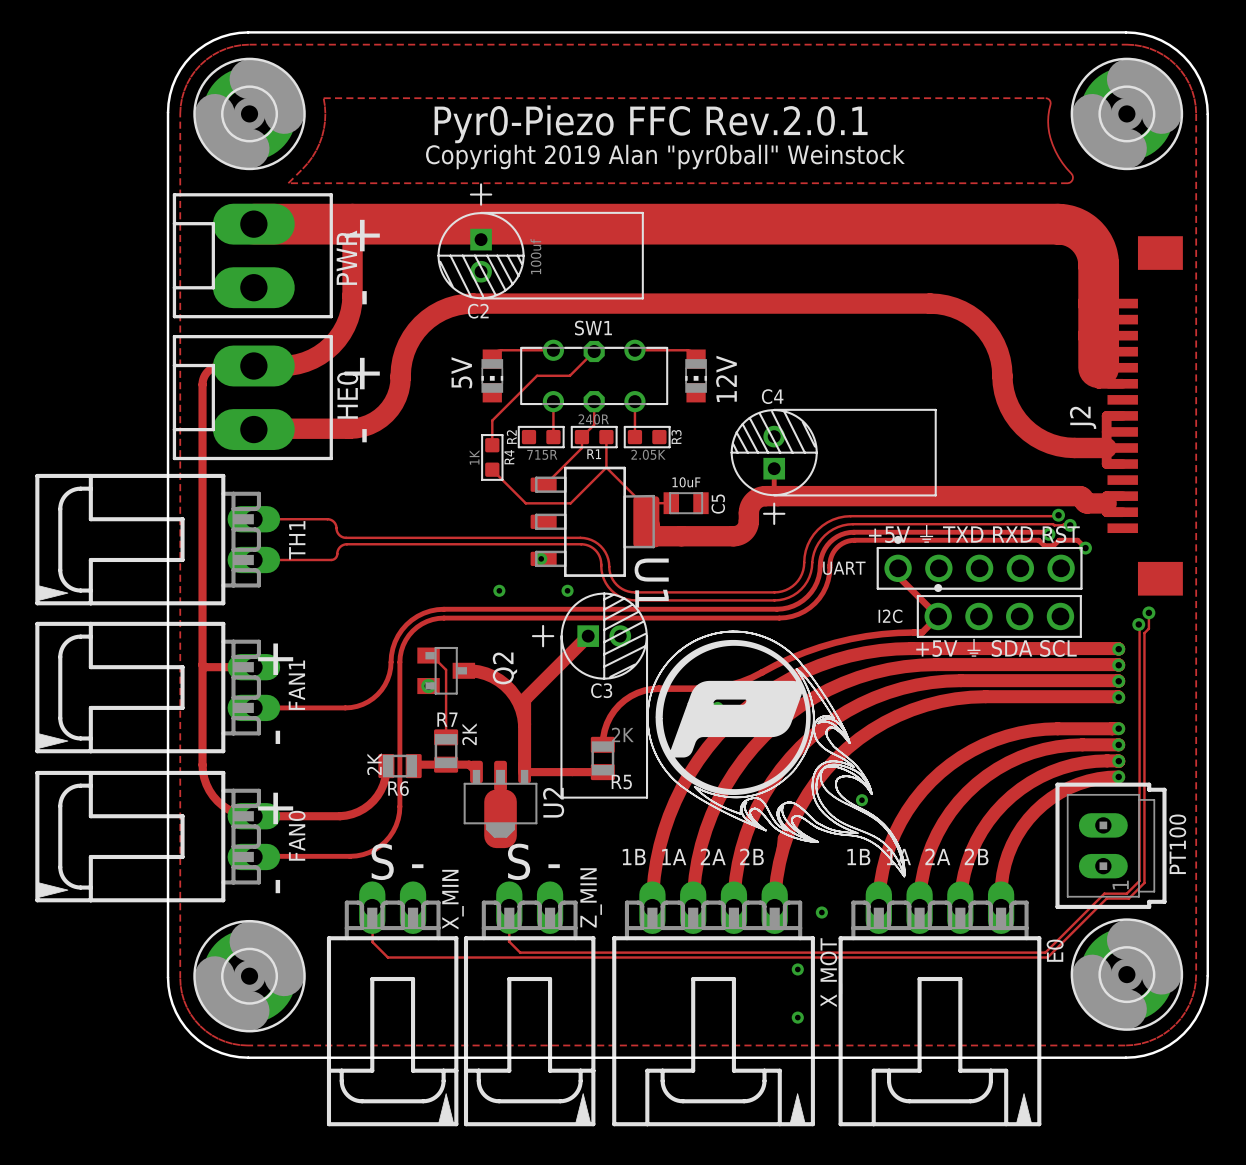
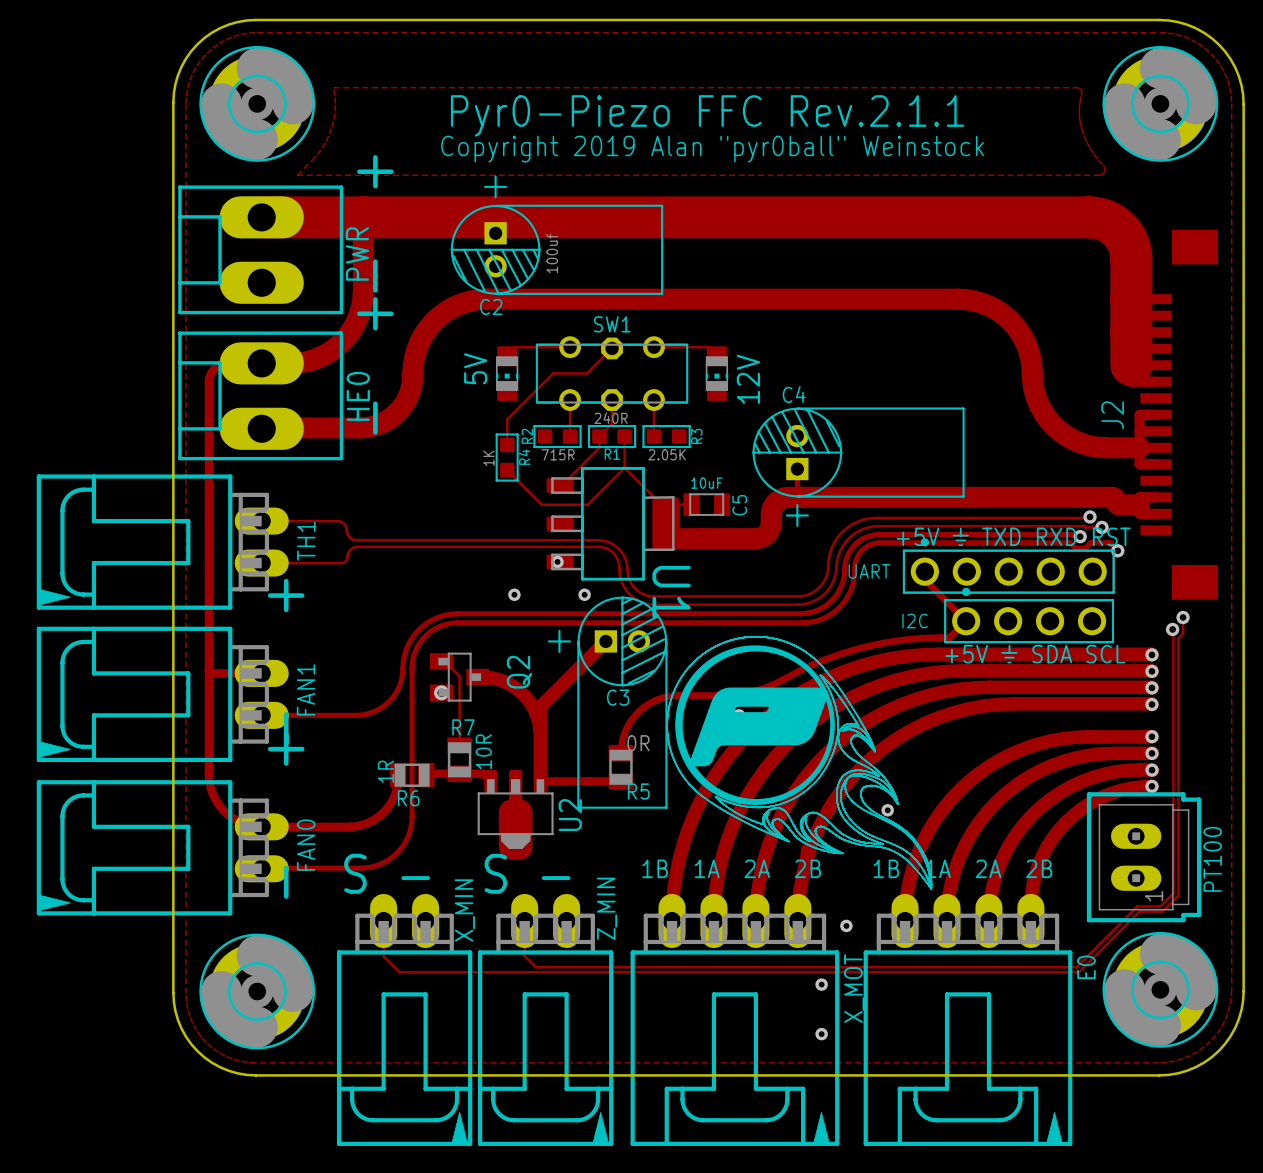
text: Pyr0-Piezo FFC Rev.2.0.1 (651, 124) -> Pyr0-Piezo FFC Rev.2.1.1 (707, 115)
R7 value: 2K (469, 734) -> 10R (483, 751)
R5 value: 2K (622, 734) -> 0R (638, 743)
R6 value: 2K (374, 764) -> 1R (385, 771)

